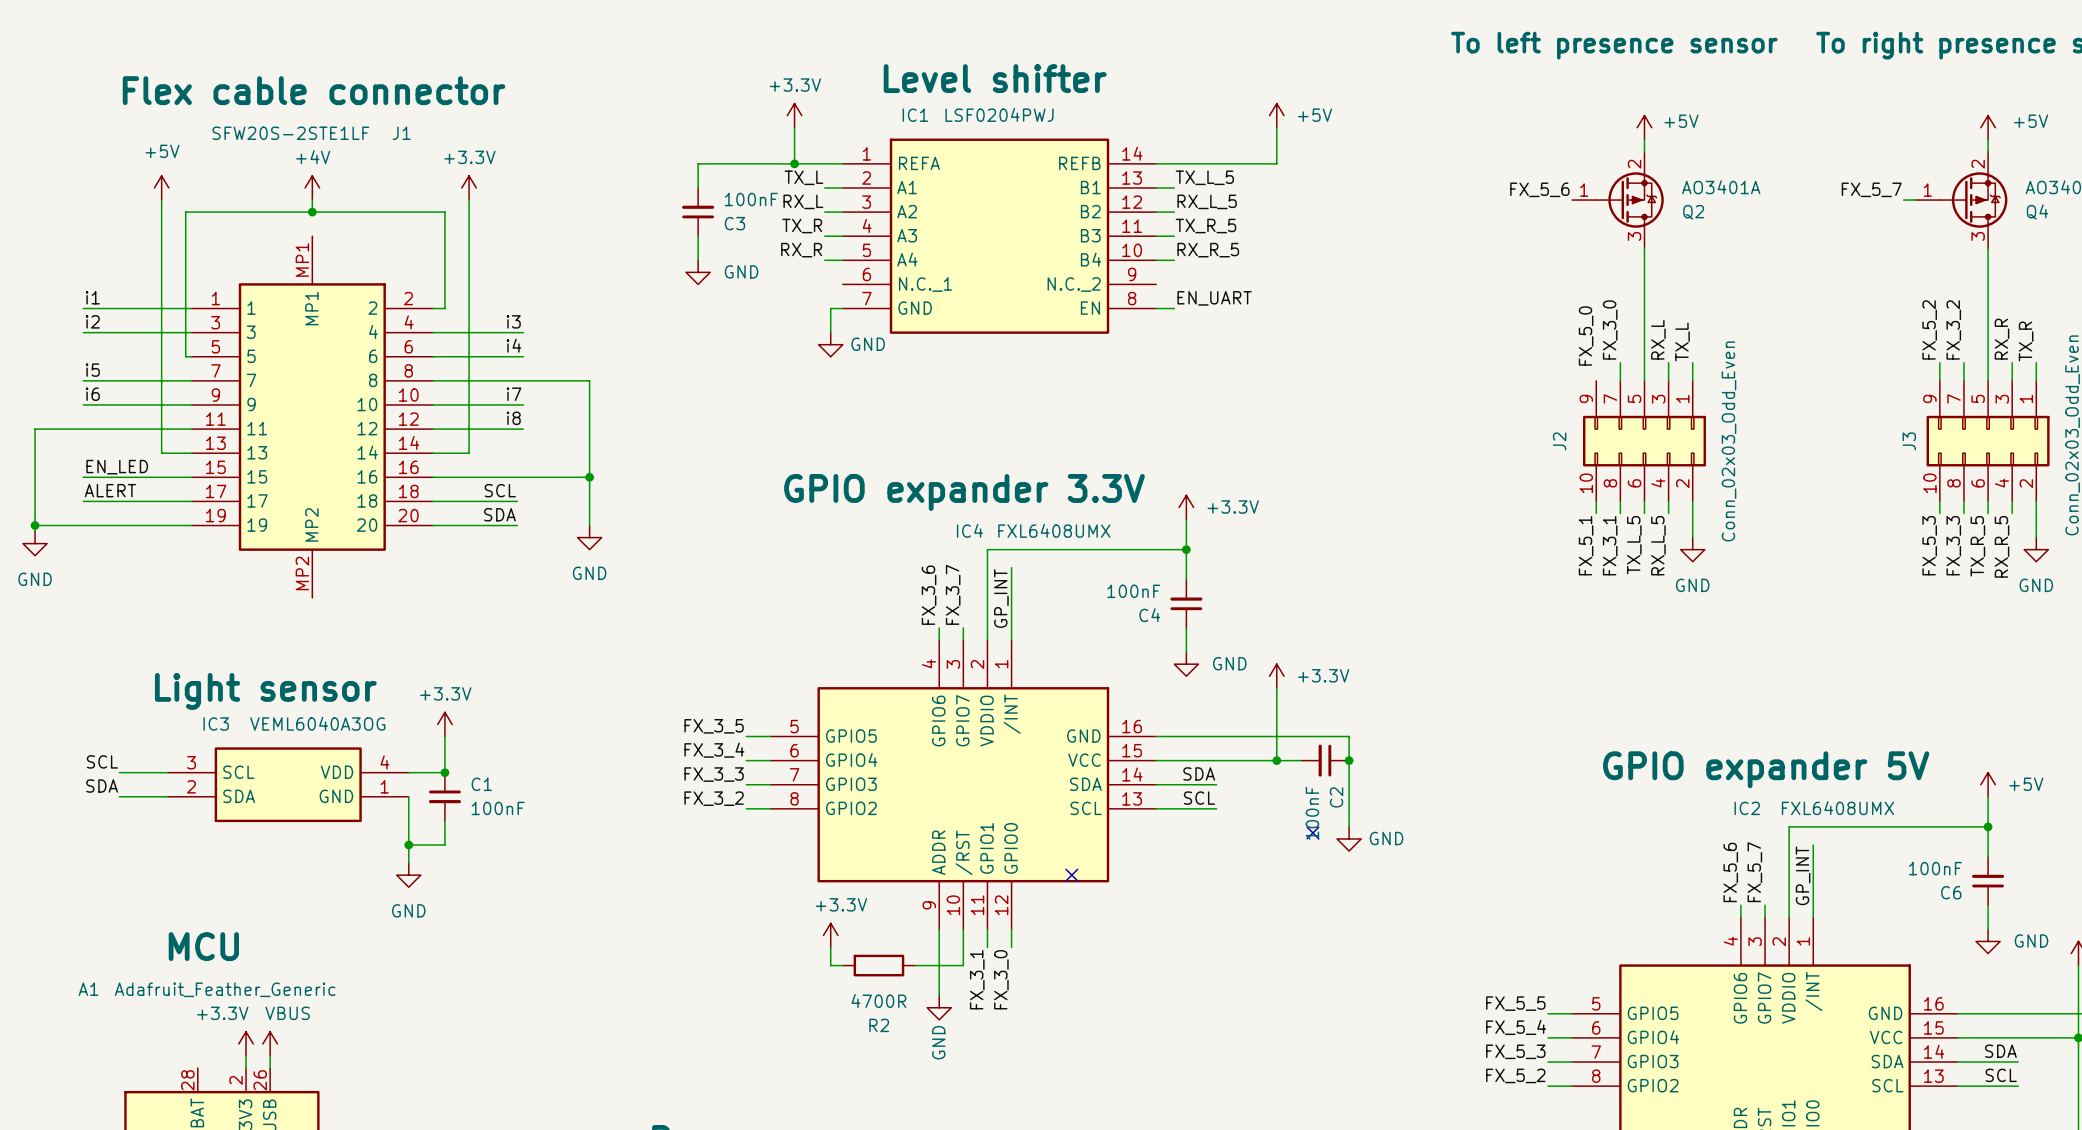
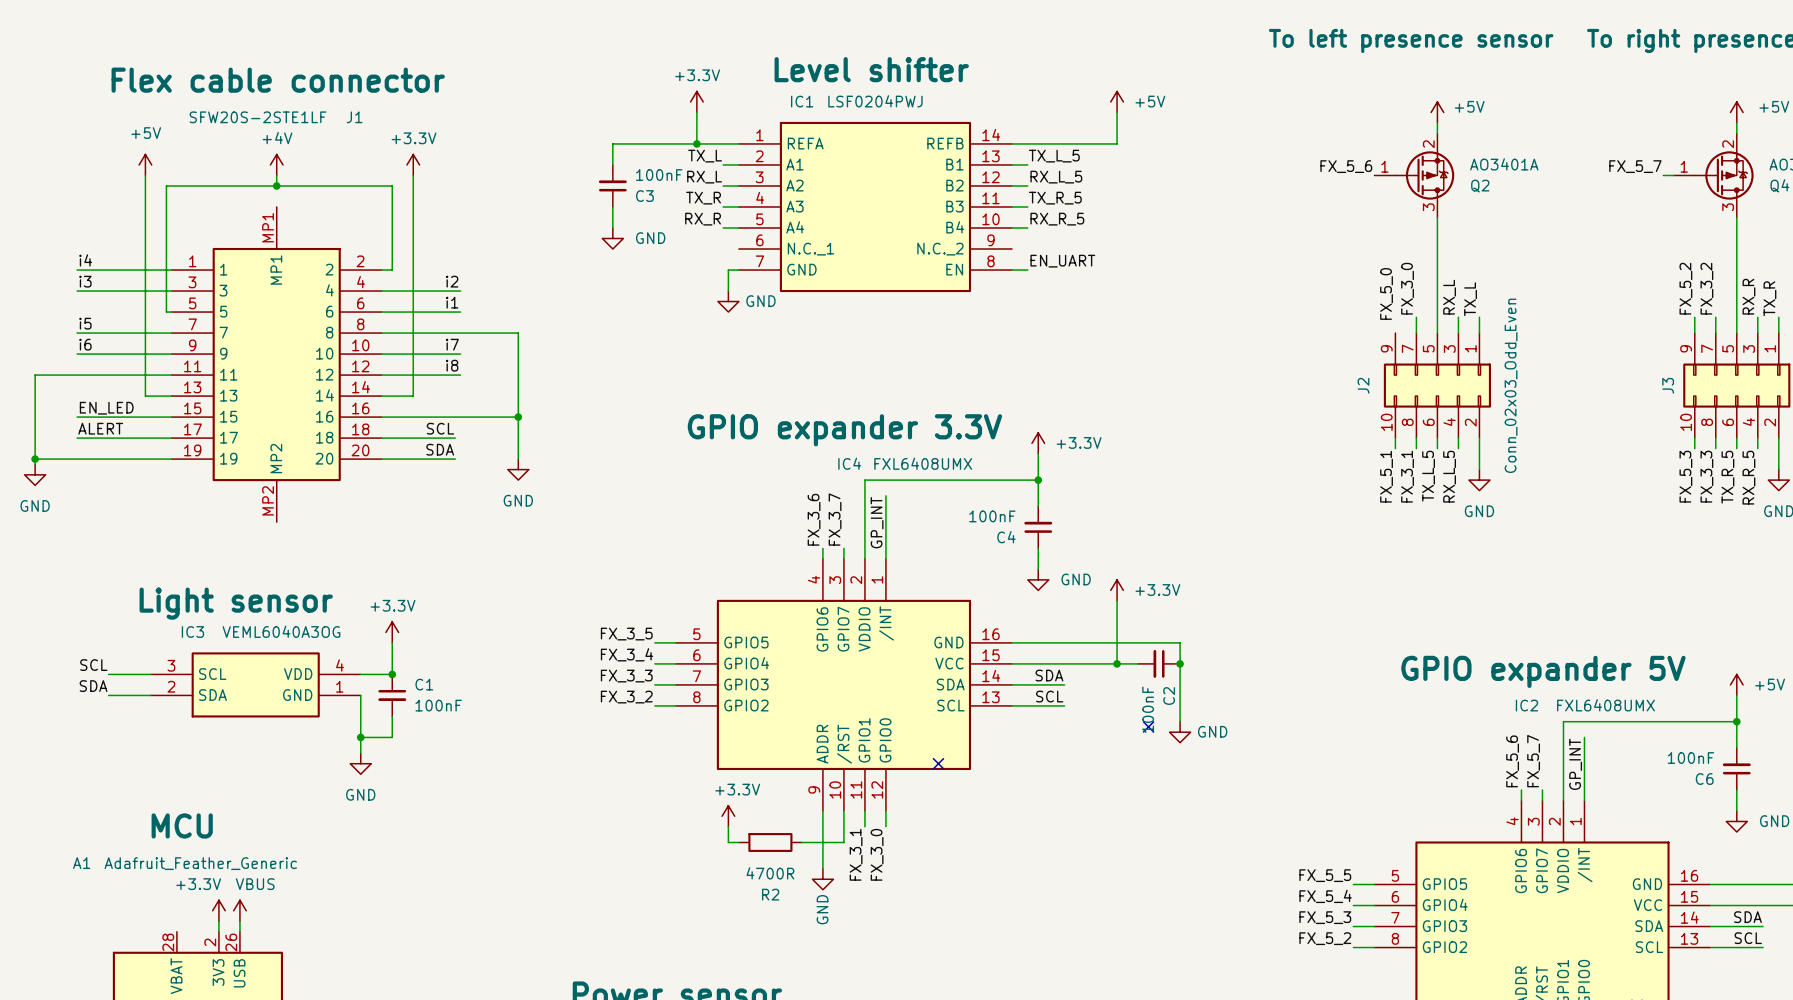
label: i1 (92, 297) -> i4 (85, 260)
label: i2 (92, 321) -> i3 (85, 281)
label: i3 (513, 321) -> i2 (452, 281)
label: i4 (514, 345) -> i1 (452, 302)

